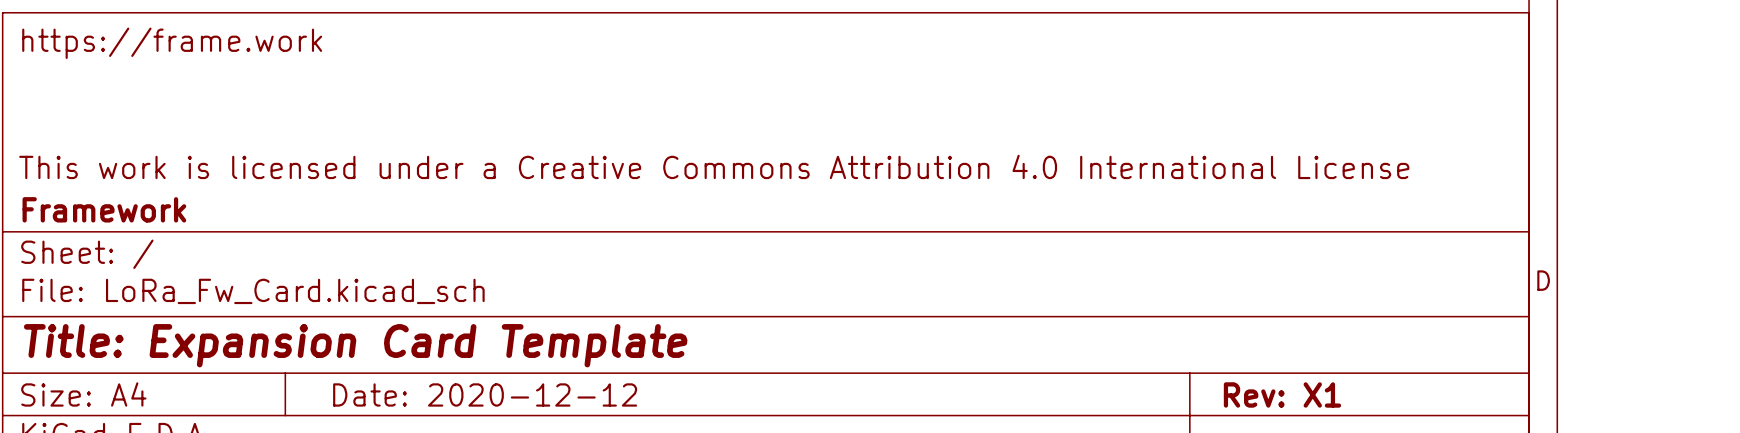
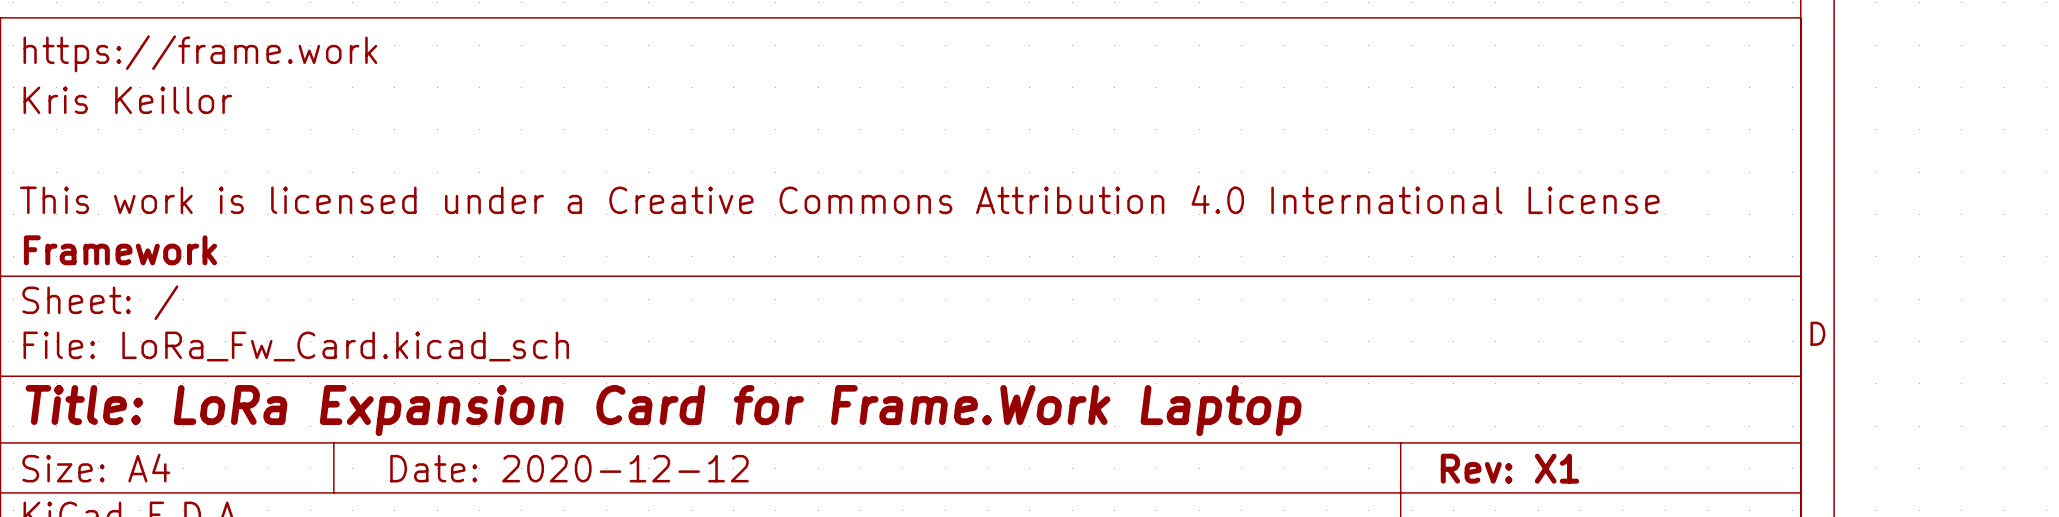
title block: none -> Kris Keillor (127, 100)
title block: Title: Expansion Card Template (355, 345) -> Title: LoRa Expansion Card for Frame.Work Laptop (663, 410)

